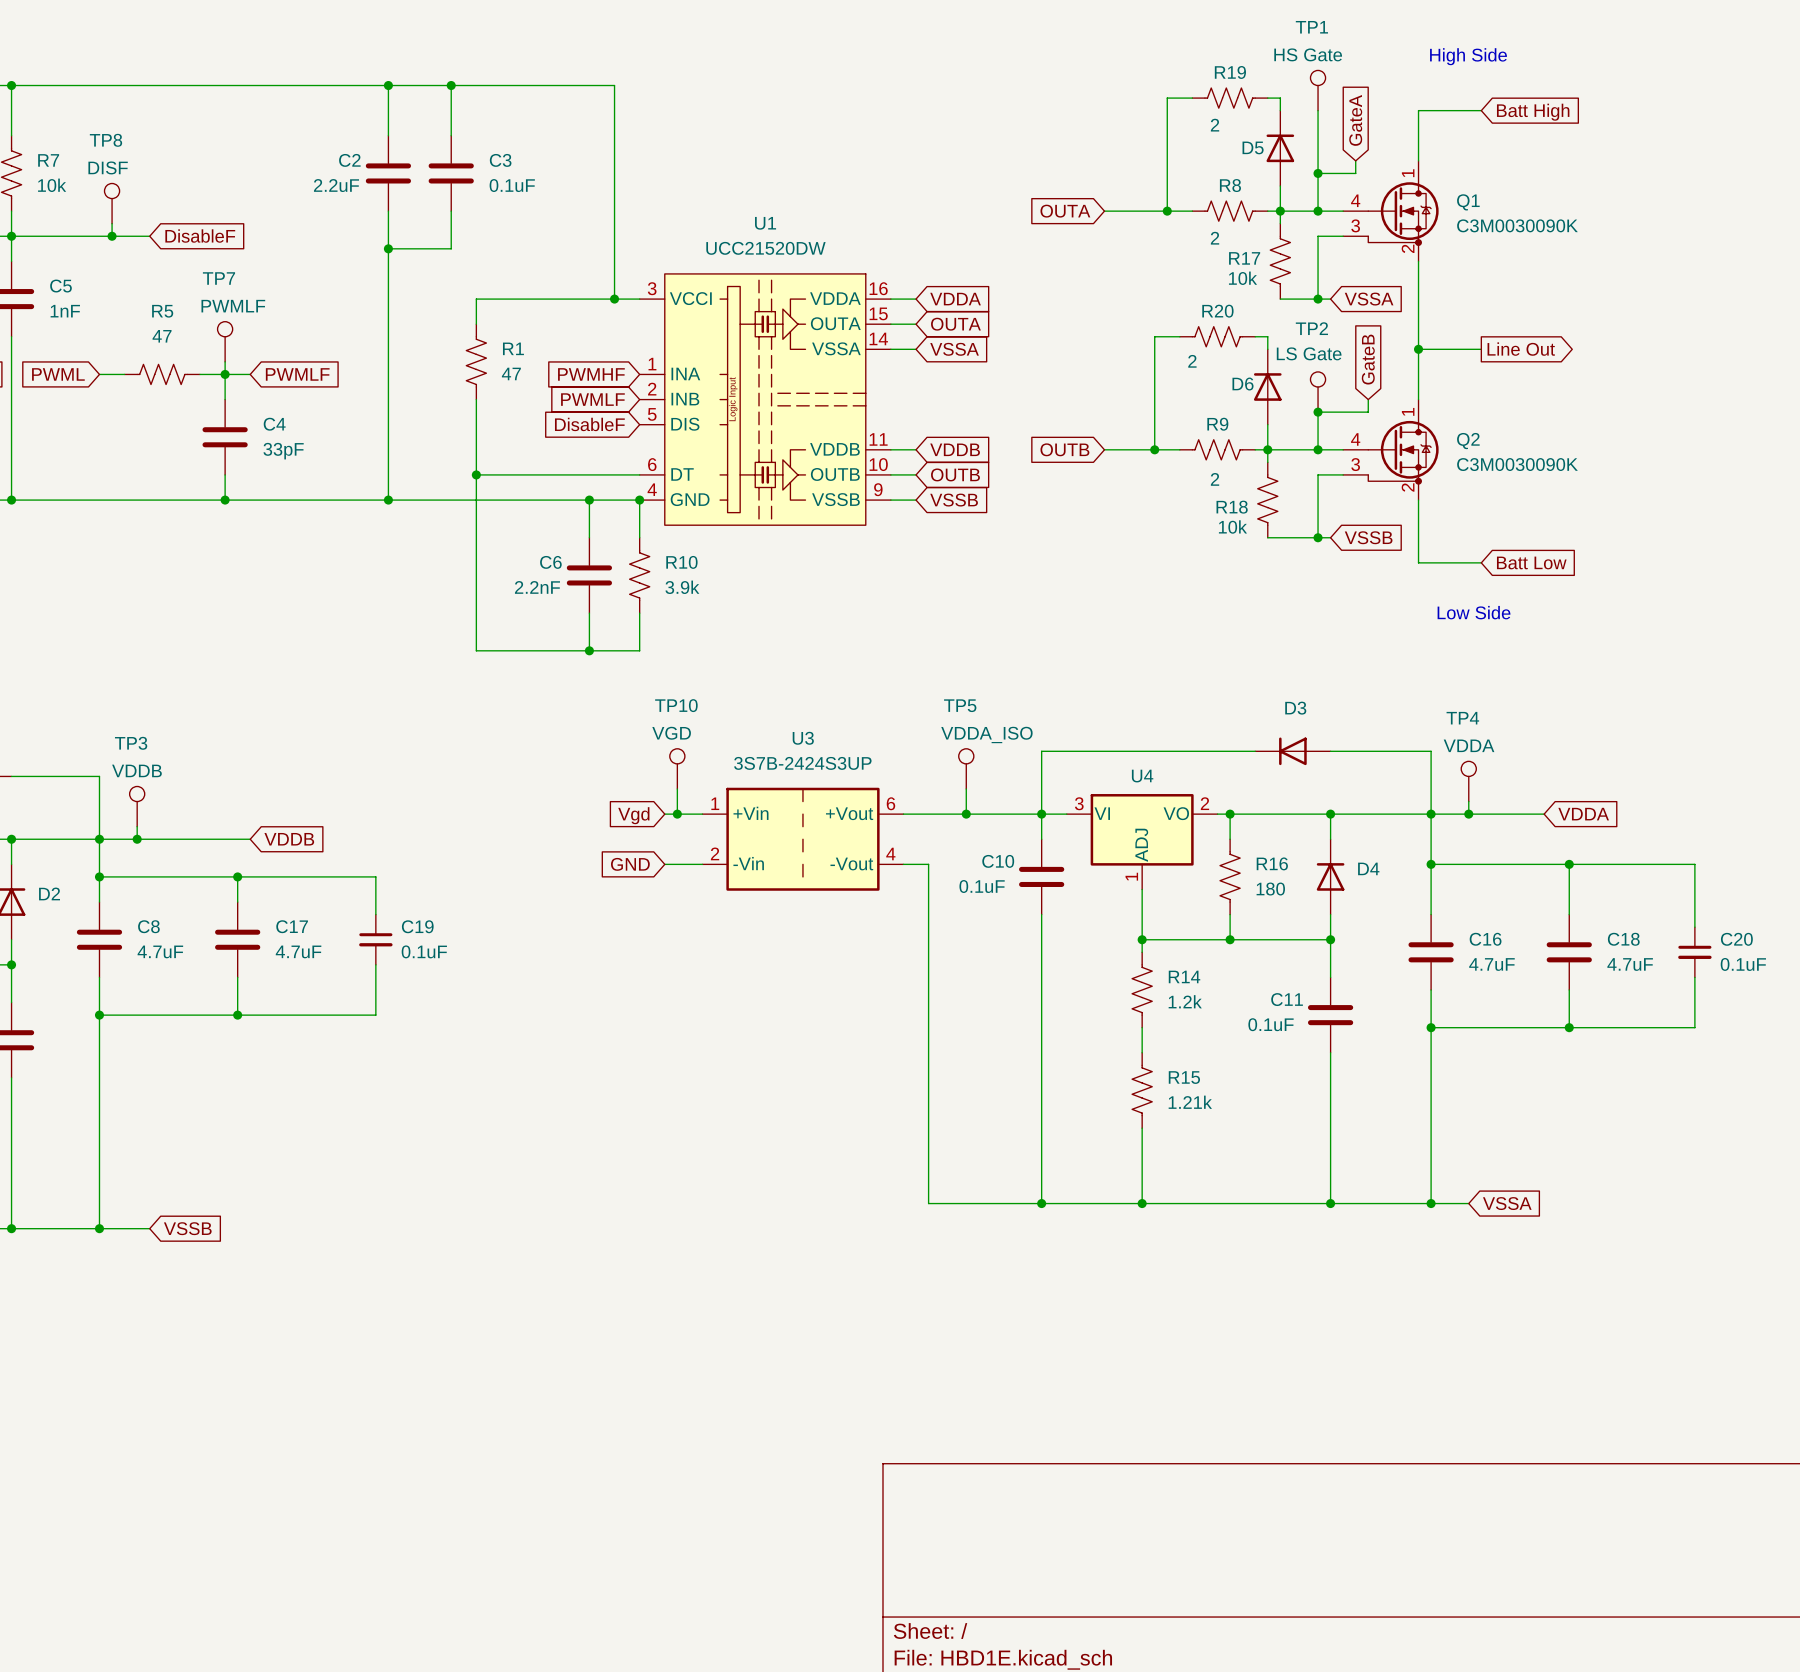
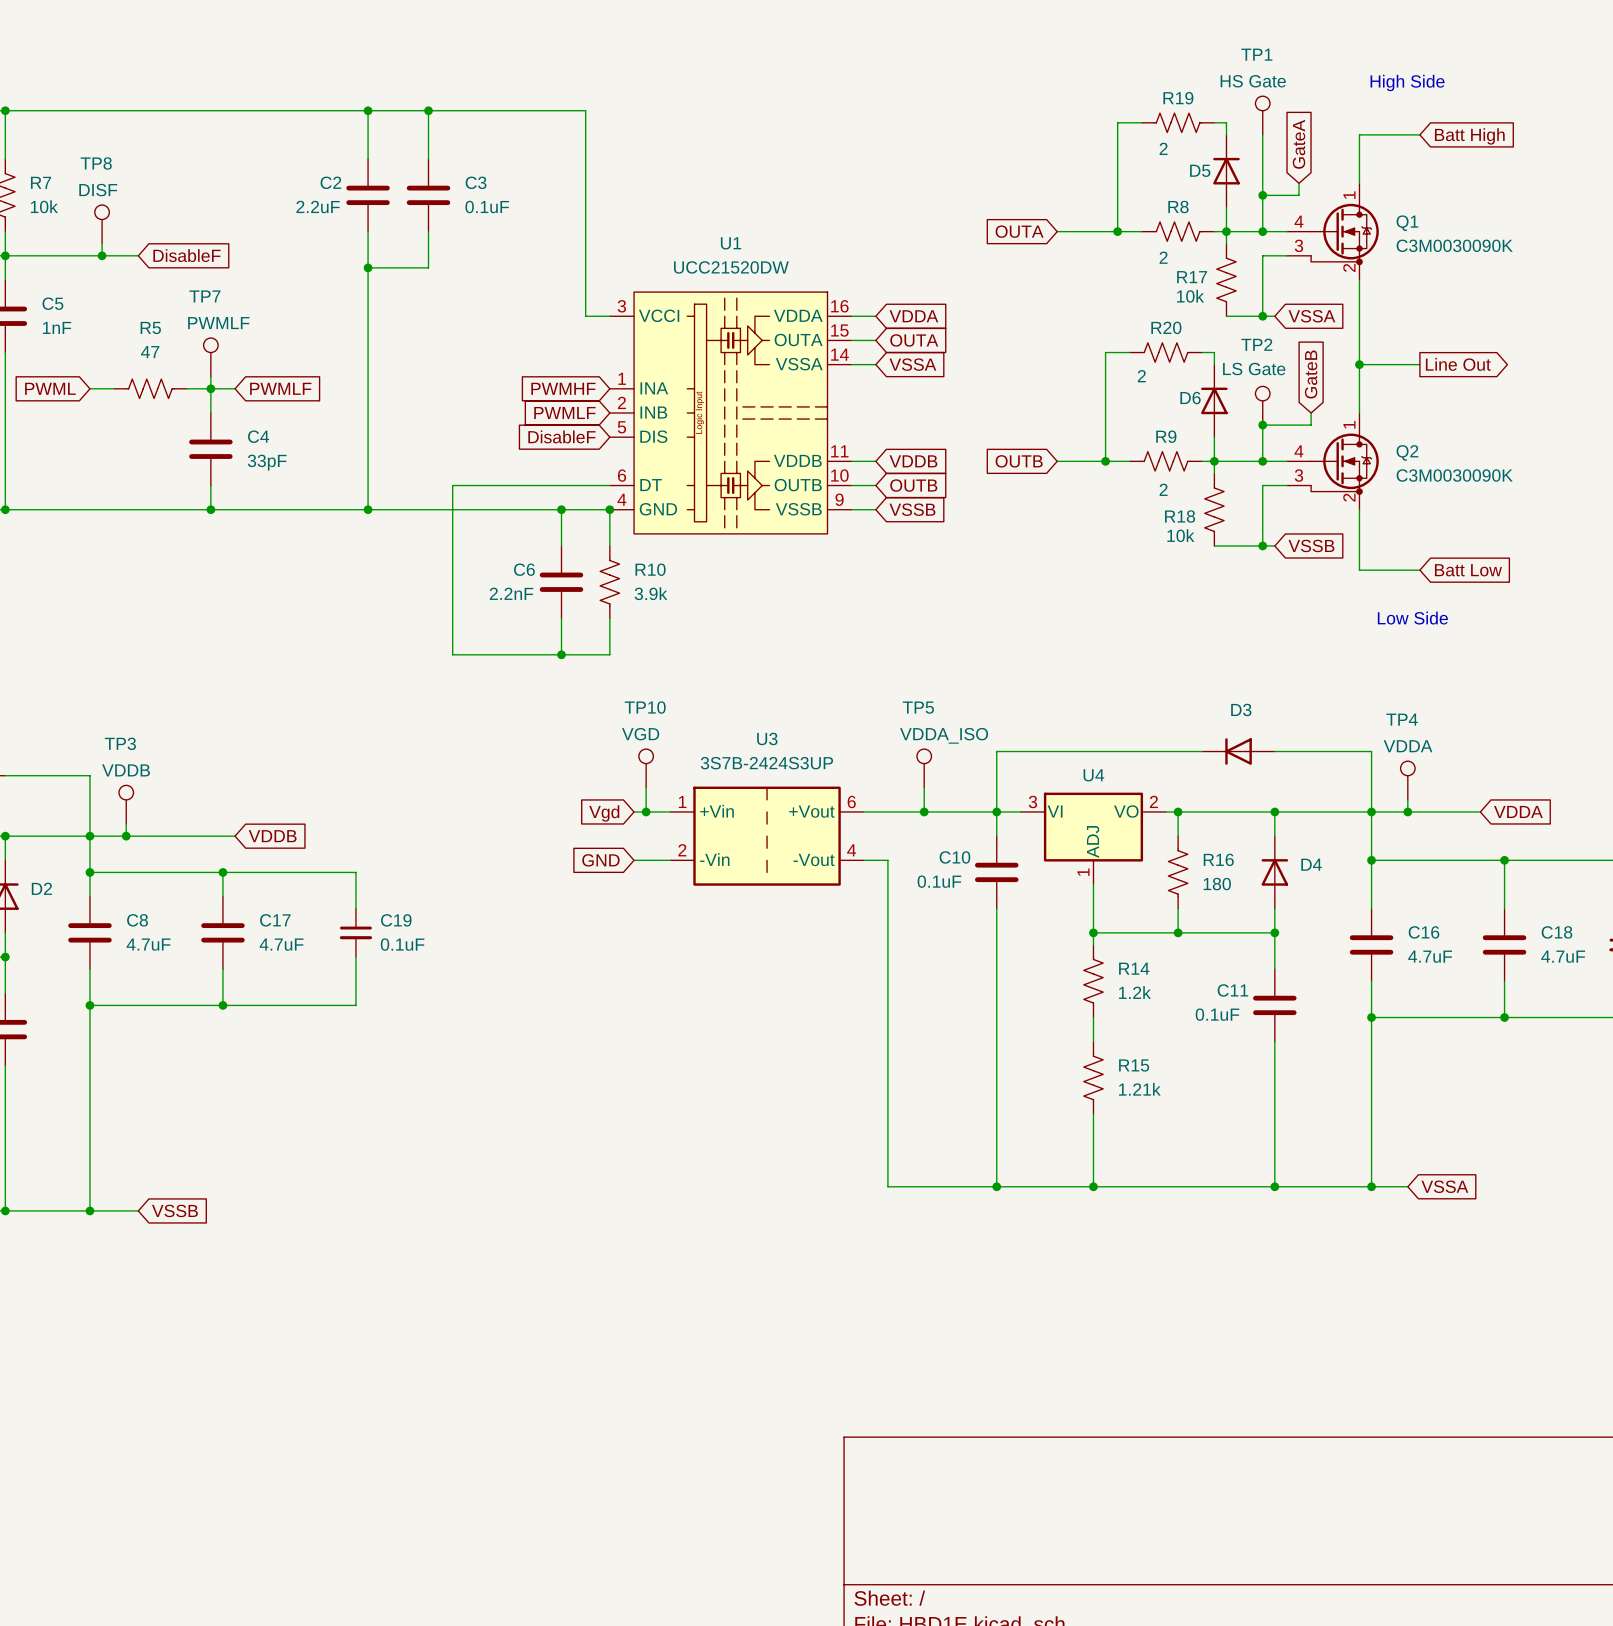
wire: (614, 299) (476, 299) (476, 324) -> none
junction: (614, 299) -> none
R1: 47 (476, 361) -> none
wire: (476, 399) (476, 474) -> none
junction: (476, 474) -> none

